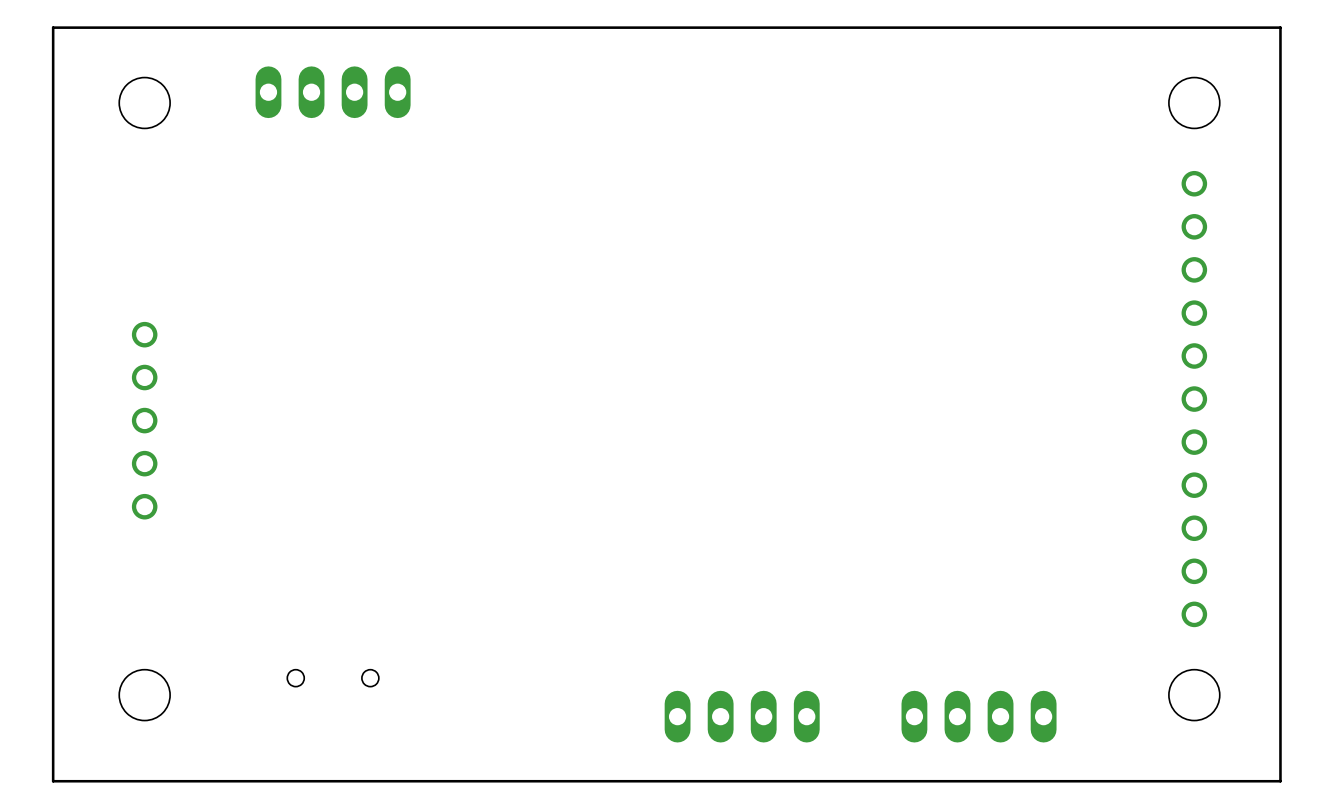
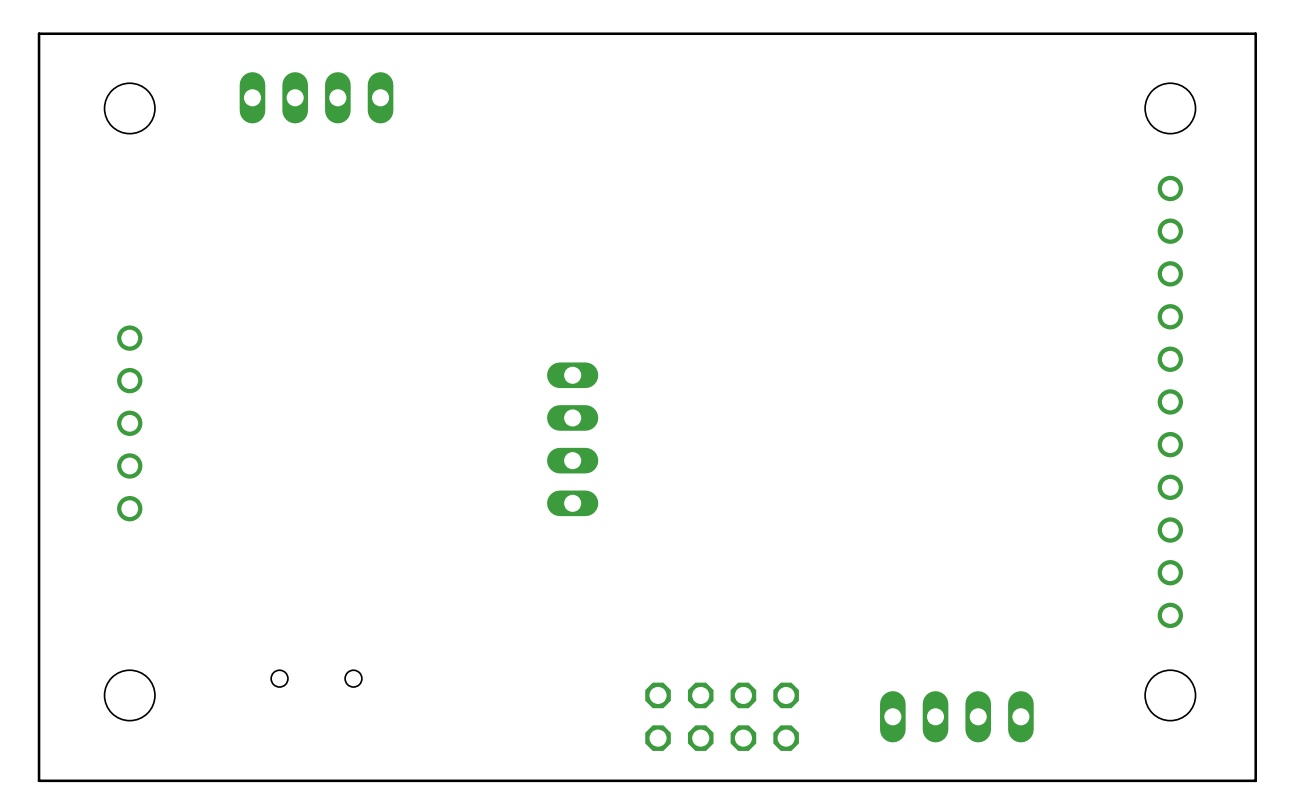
part: none -> (572, 439)
part footprint: [664, 690, 820, 743] -> [645, 682, 799, 751]

